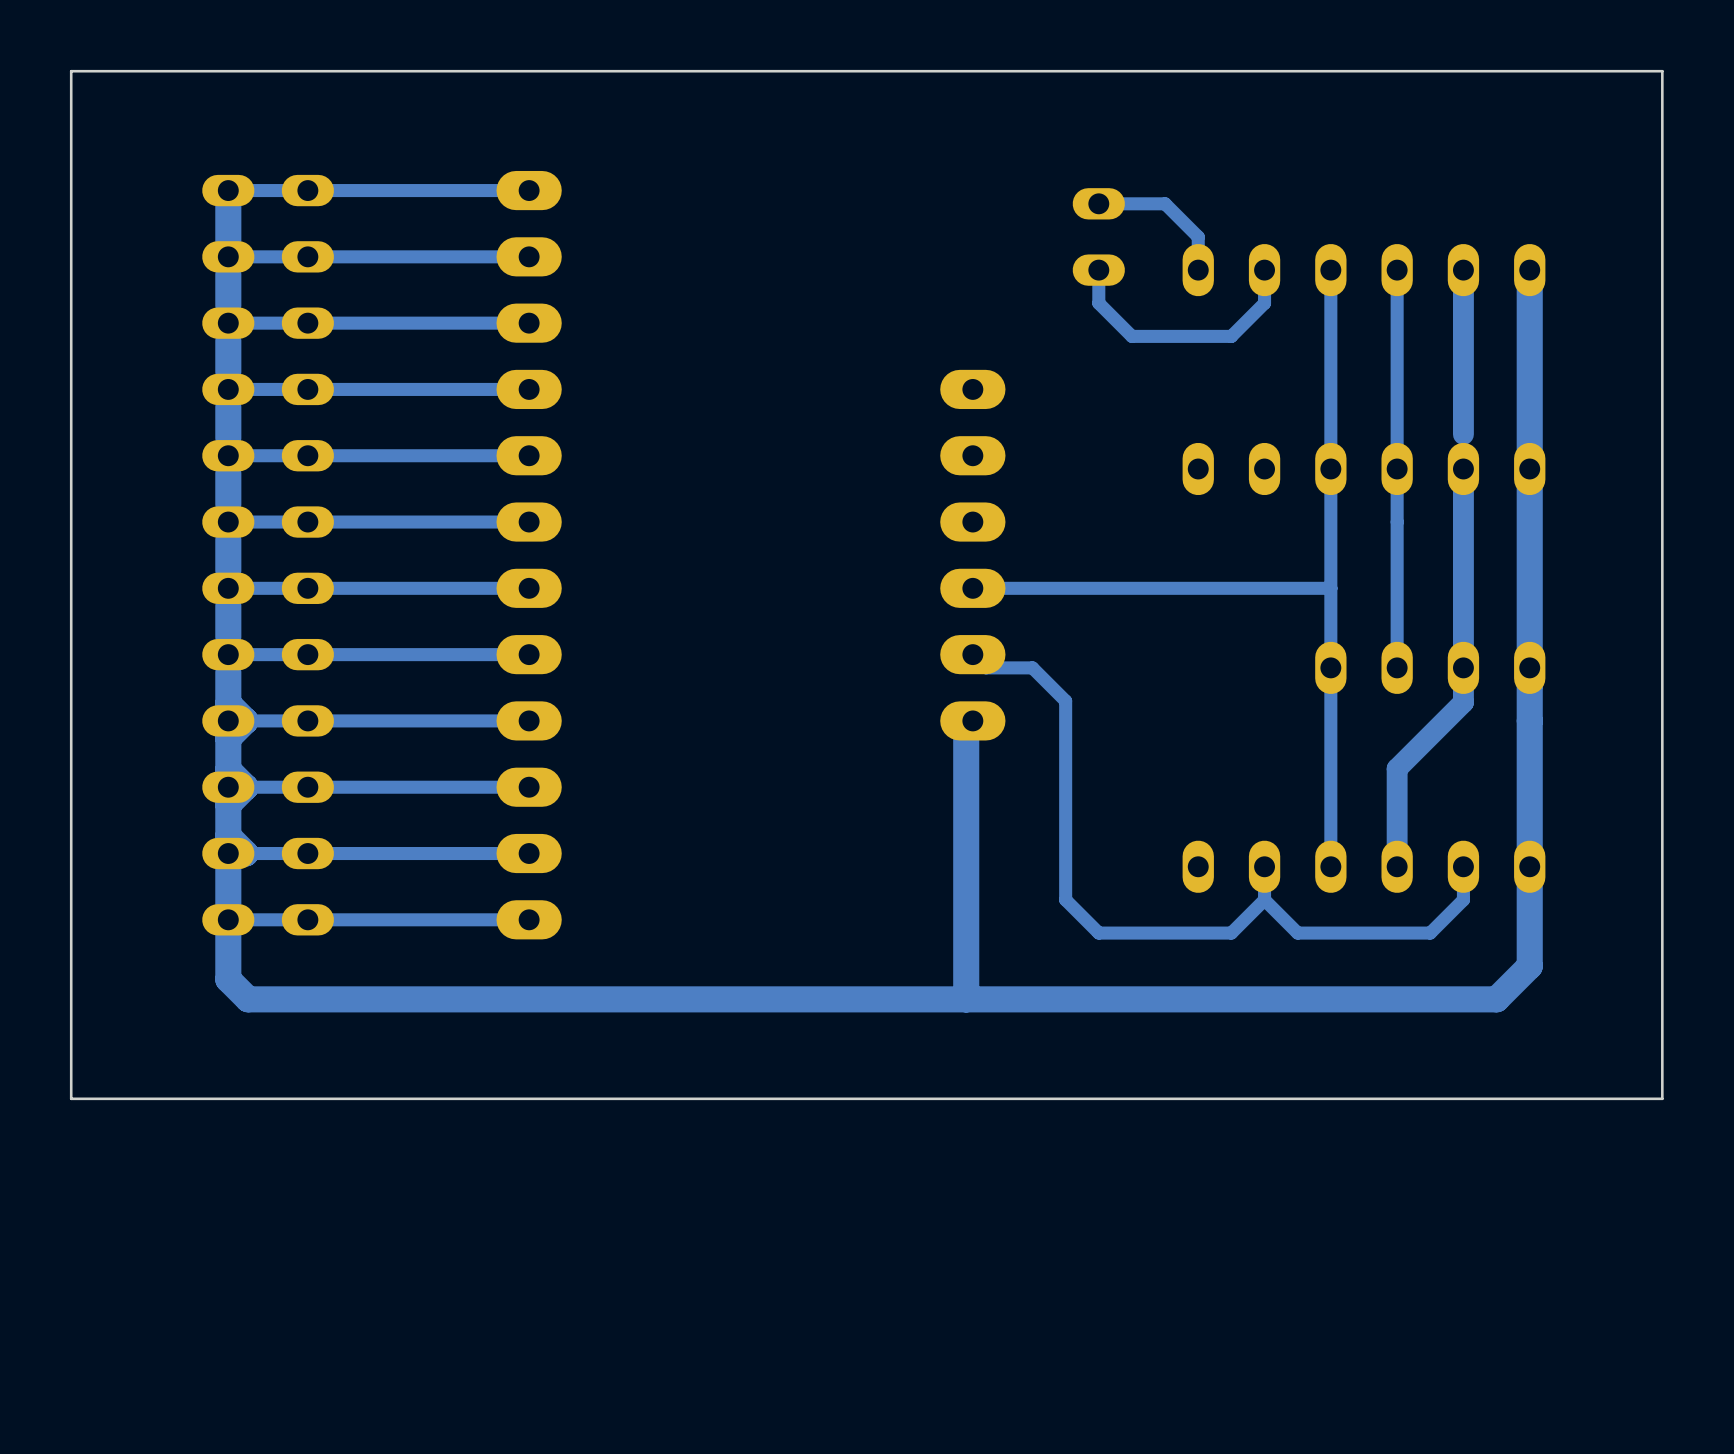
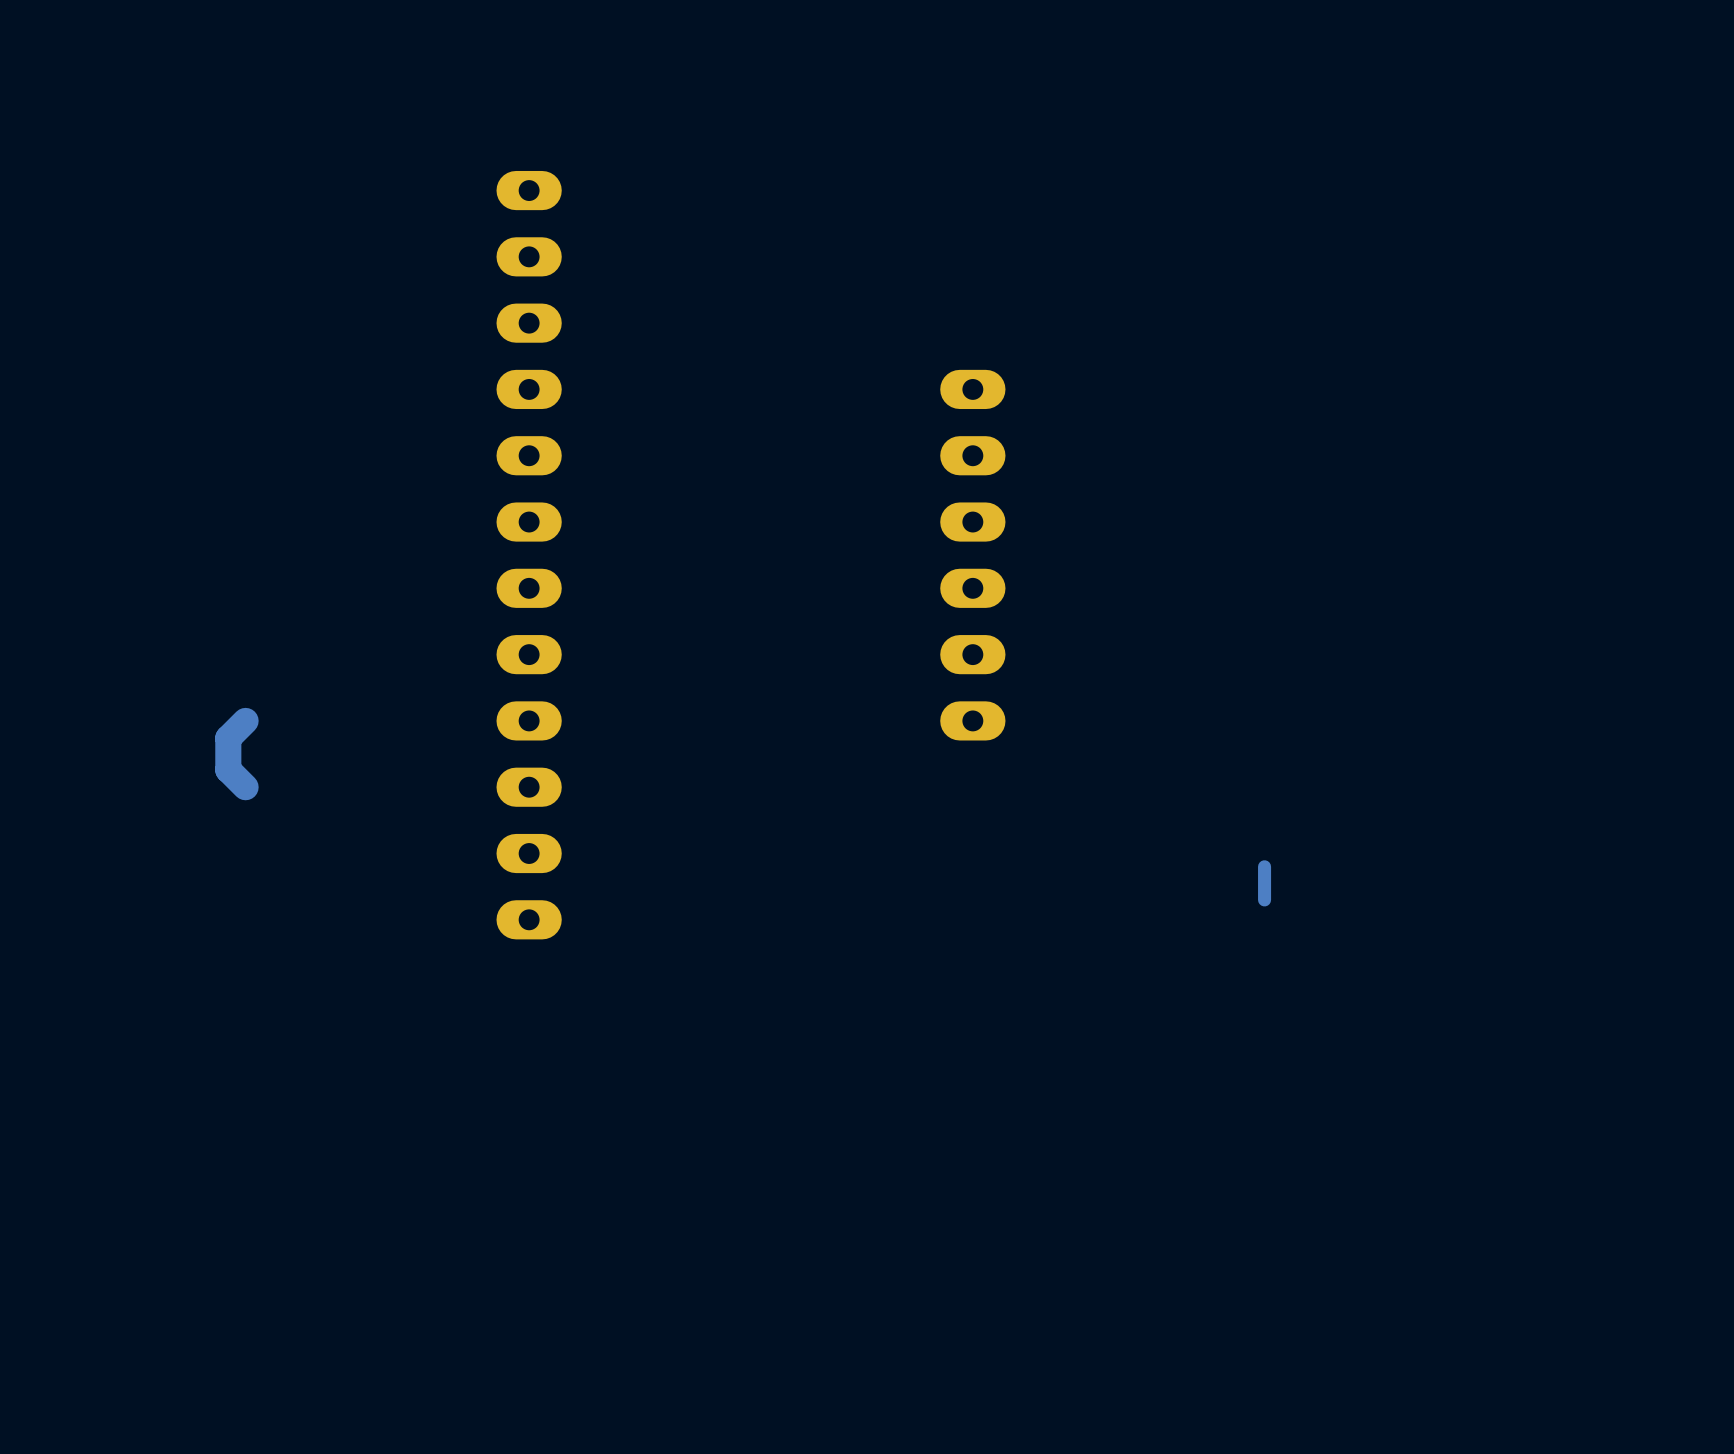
board edge: (1662, 71) (71, 71) (71, 1098) (1662, 1098) (1662, 71) -> none
track: (228, 190) (228, 256) (245, 256) (228, 274) (228, 305) (245, 323) -> none
track: (529, 190) (230, 190) -> none
track: (1098, 203) (1165, 203) (1198, 236) (1198, 270) -> none
part: (1098, 236) -> none
track: (529, 256) (230, 256) -> none
track: (1264, 270) (1264, 303) (1231, 336) (1131, 336) (1098, 303) (1098, 270) -> none
track: (1330, 270) (1330, 866) -> none
part: (1363, 270) -> none
track: (1397, 270) (1397, 468) -> none
track: (1463, 270) (1463, 434) -> none
track: (1529, 270) (1529, 966) (1496, 999) (248, 999) (228, 979) (228, 853) (245, 853) (228, 836) (228, 804) (245, 787) (228, 787) -> none
track: (245, 323) (228, 340) (228, 372) (245, 389) -> none
track: (529, 323) (230, 323) -> none
track: (245, 389) (228, 406) (228, 438) (245, 455) -> none
track: (529, 389) (230, 389) -> none
track: (245, 455) (228, 473) (228, 504) (245, 522) -> none
track: (529, 455) (230, 455) -> none
part: (1363, 468) -> none
track: (1463, 468) (1463, 702) (1397, 768) (1397, 866) -> none
track: (1397, 486) (1397, 667) -> none
track: (245, 522) (228, 539) (228, 571) (245, 588) -> none
track: (529, 522) (230, 522) -> none
part: (228, 555) -> none
part: (307, 555) -> none
track: (245, 588) (228, 605) (228, 637) (245, 654) -> none
track: (529, 588) (230, 588) -> none
track: (1330, 588) (972, 588) -> none
track: (529, 654) (230, 654) -> none
track: (972, 654) (986, 667) (1032, 667) (1065, 701) (1065, 899) (1098, 933) (1231, 933) (1264, 899) (1297, 933) (1430, 933) (1463, 899) (1463, 866) -> none
part: (1430, 667) -> none
track: (228, 671) (228, 703) (245, 720) (228, 720) -> none
track: (529, 720) (230, 720) -> none
track: (972, 720) (966, 727) (966, 999) -> none
track: (529, 787) (230, 787) -> none
track: (529, 853) (230, 853) -> none
part: (1264, 866) -> none
part: (1463, 866) -> none
track: (529, 919) (230, 919) -> none

